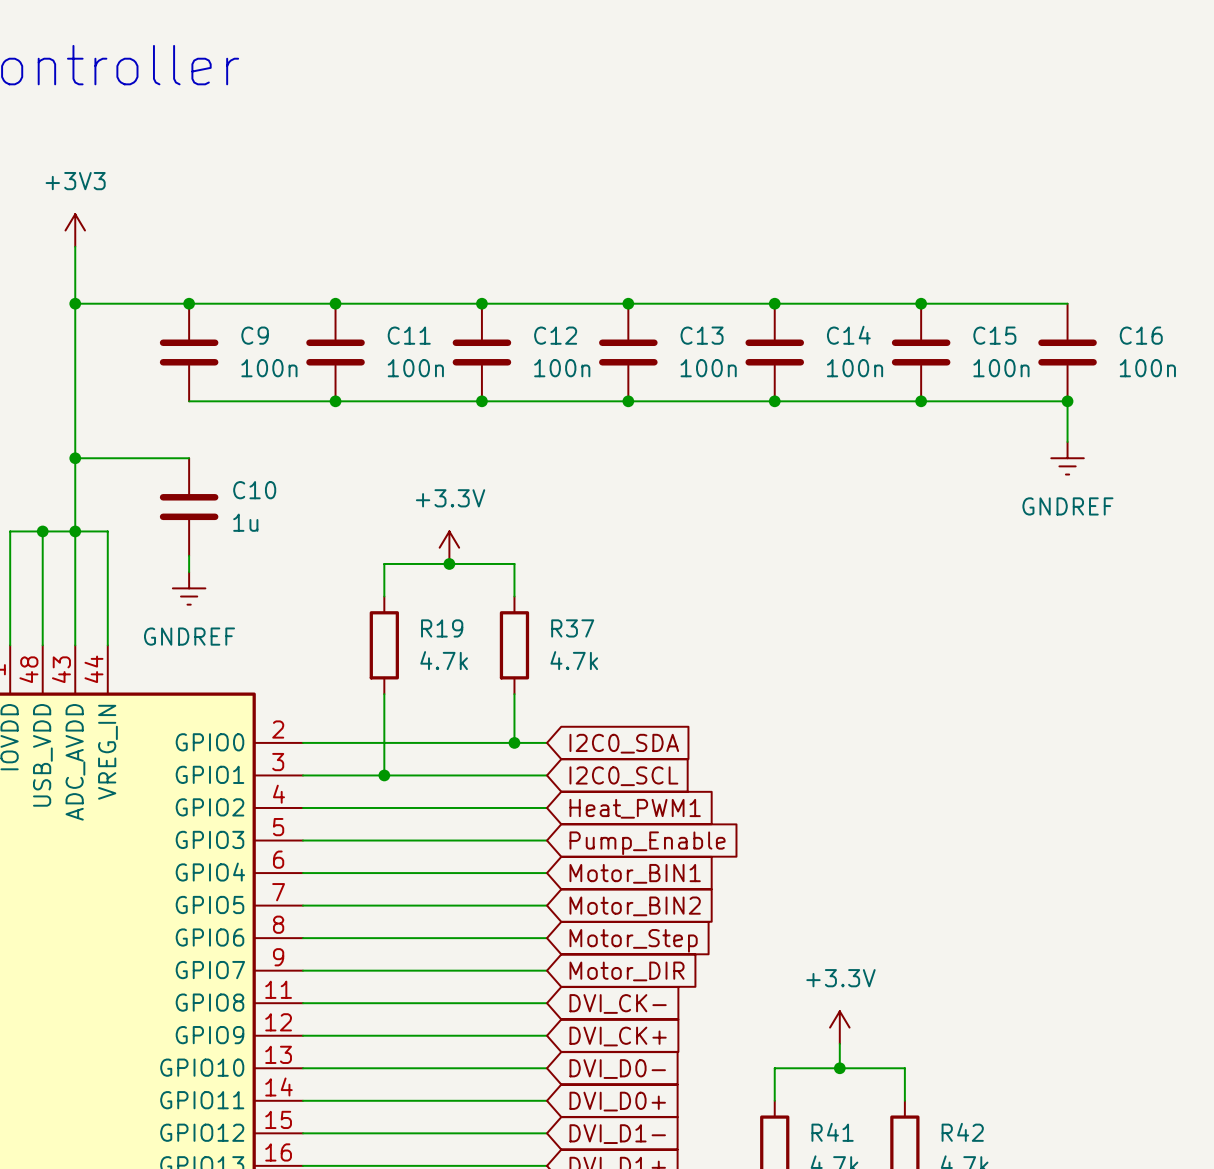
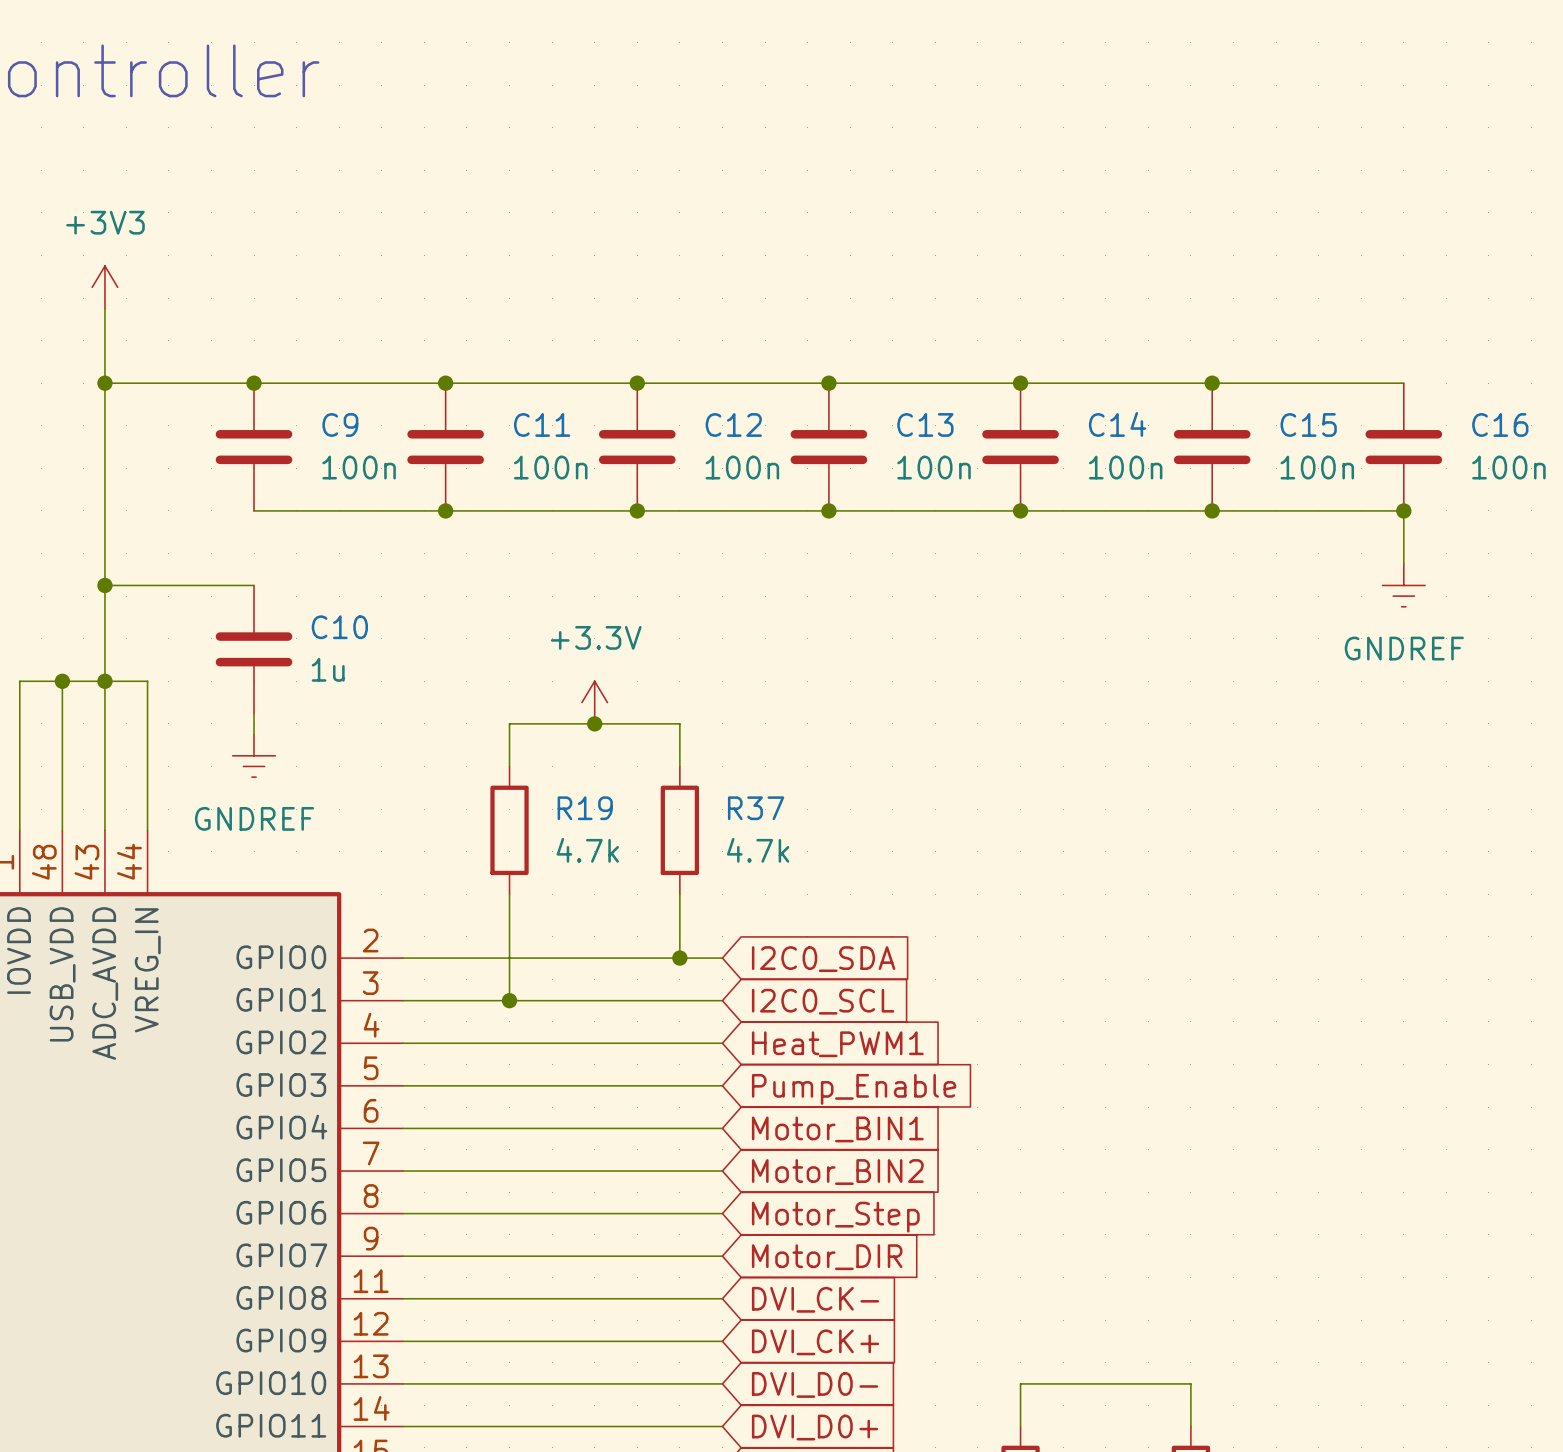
power symbol: +3.3V (839, 1027) -> none
wire: (839, 1043) (839, 1068) -> none
junction: (839, 1068) -> none

